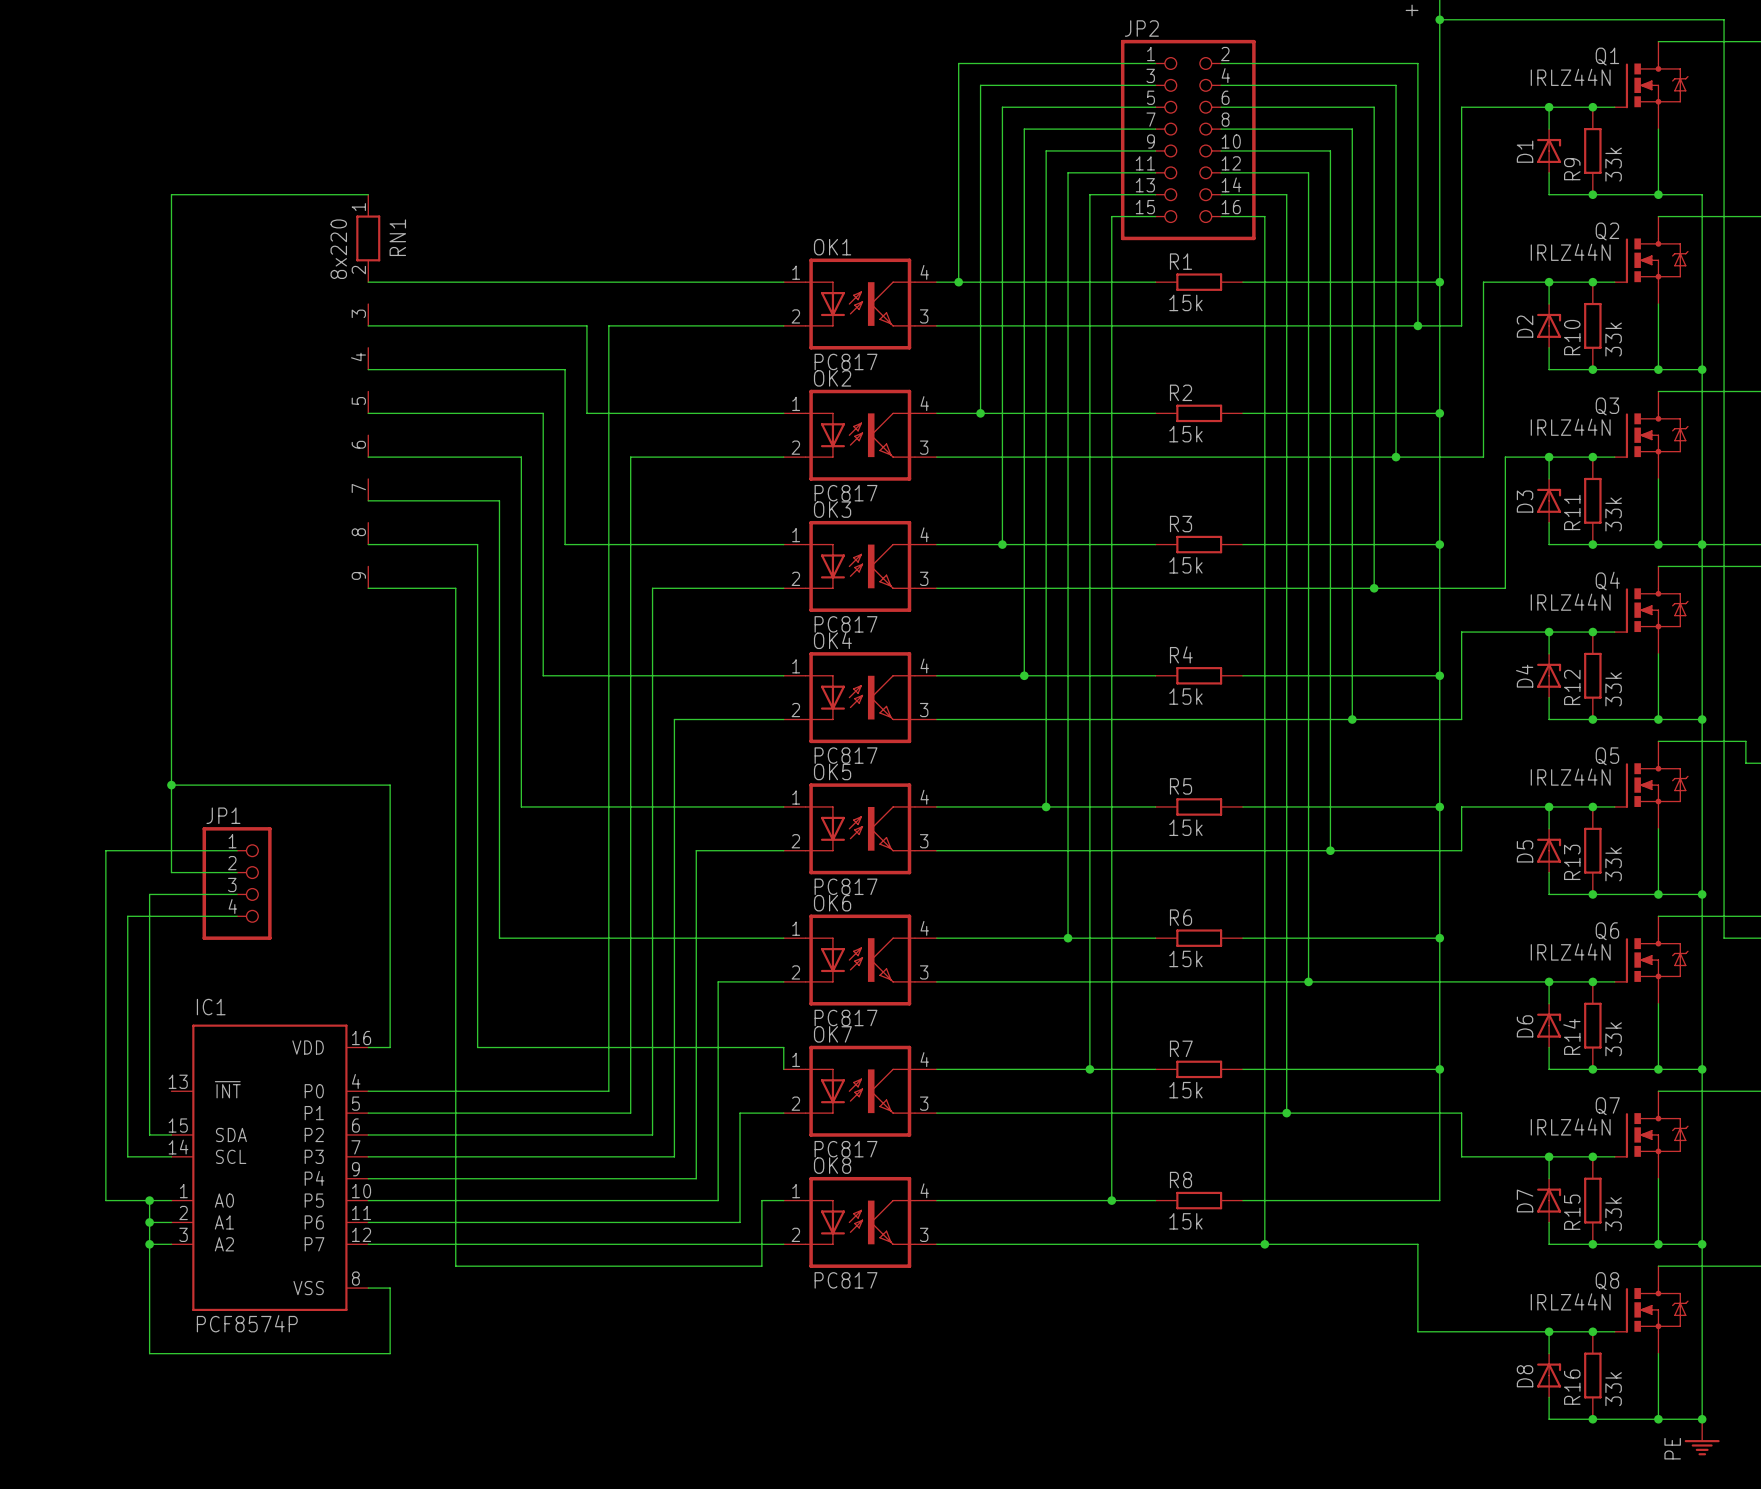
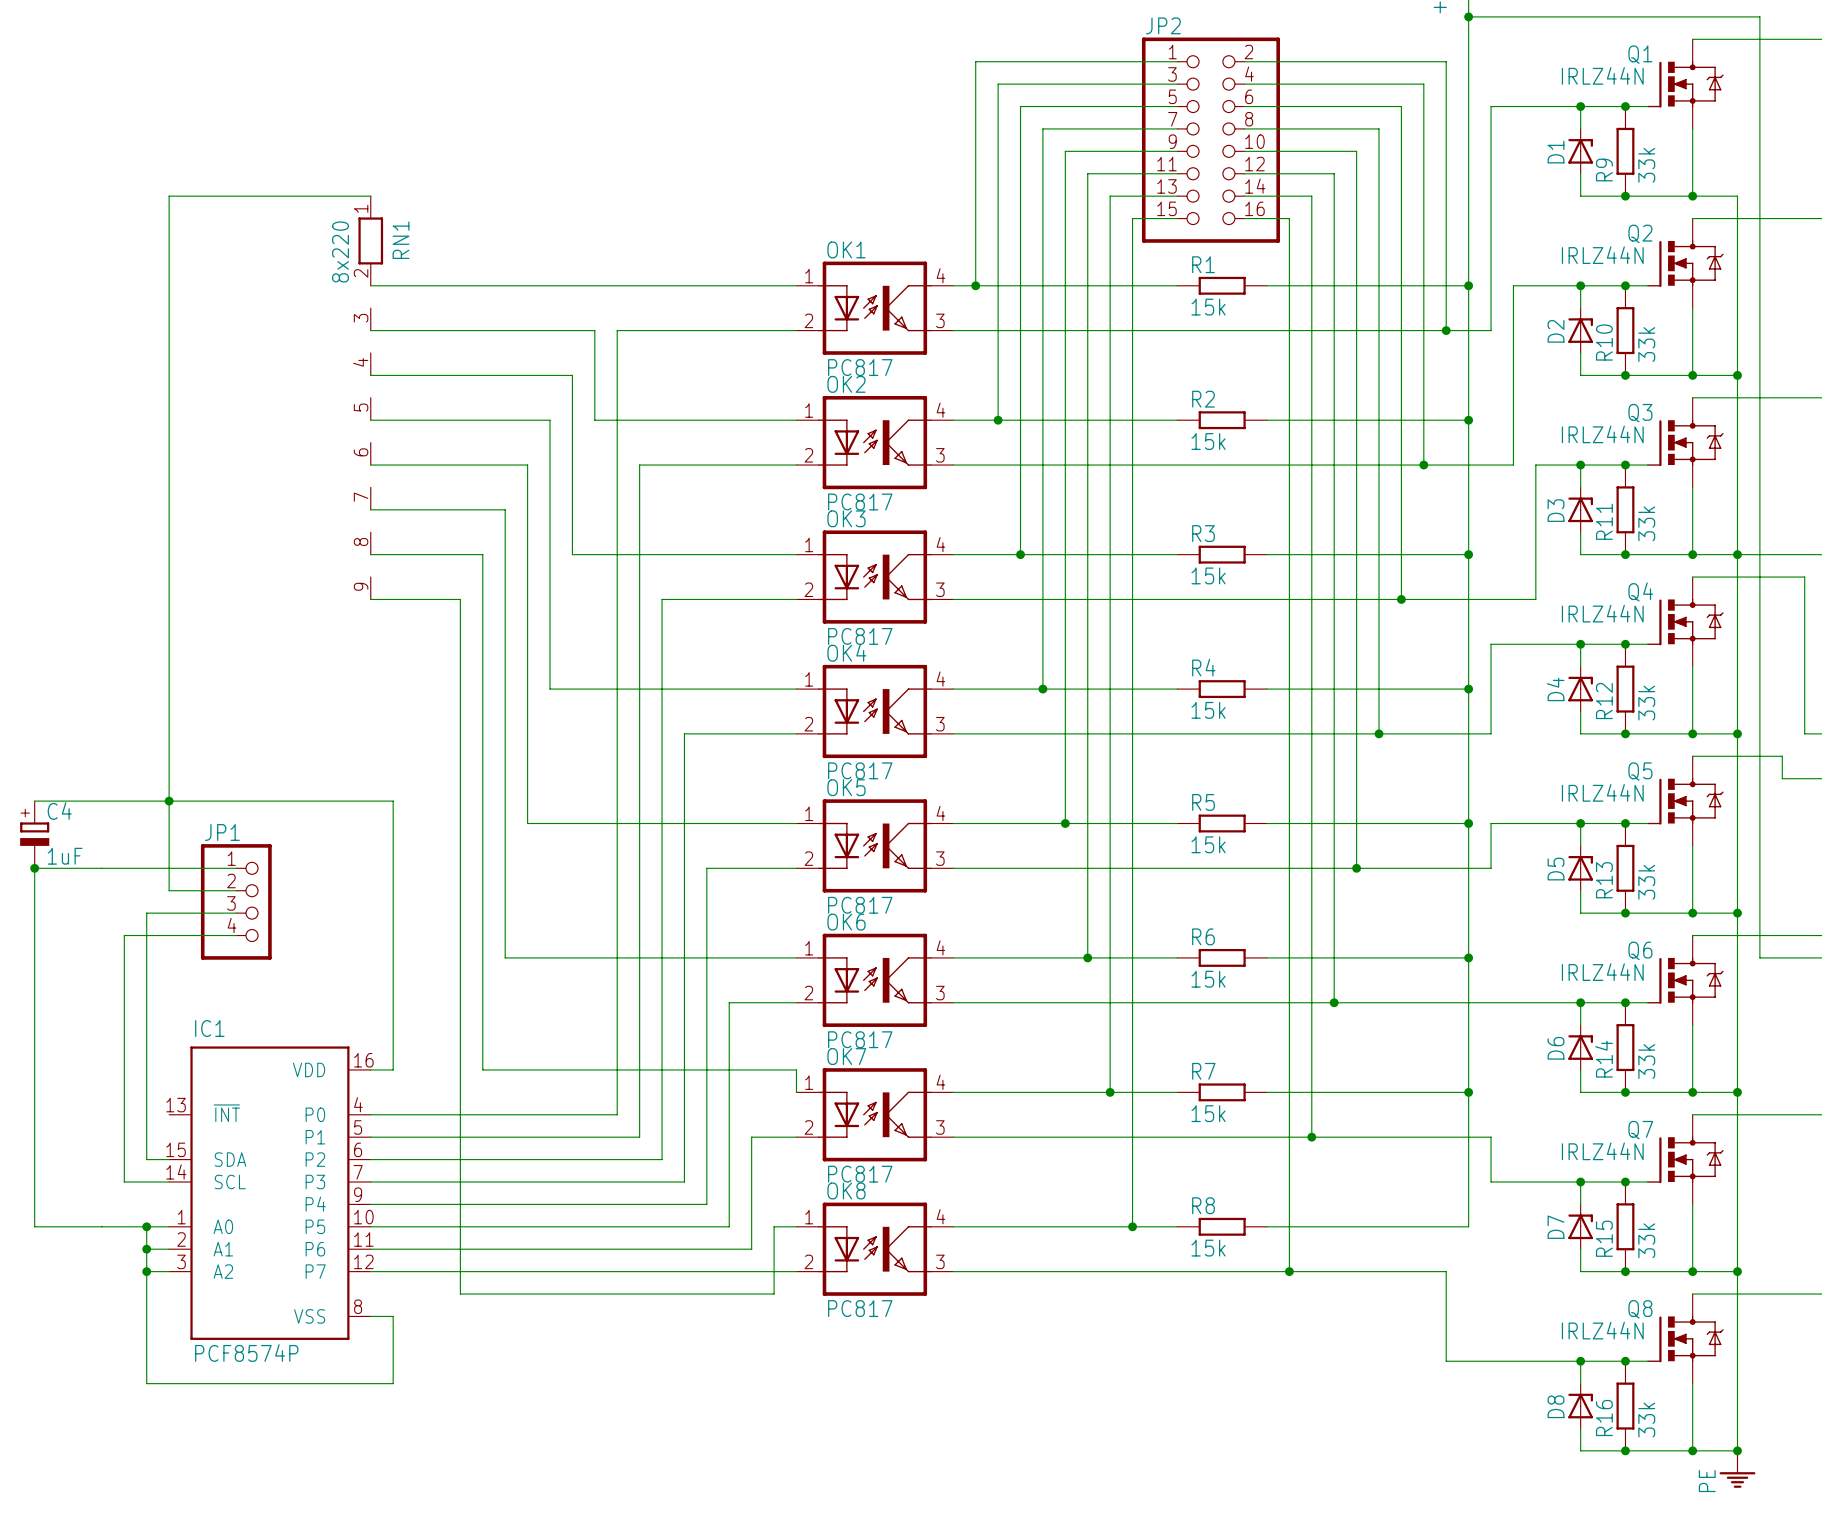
wire: none -> (34, 801) (169, 801)
C4: none -> 1uF (34, 834)
junction: none -> (34, 868)
wire: (105, 850) (105, 1200) -> (101, 868) (34, 868) (34, 1226) (101, 1226)

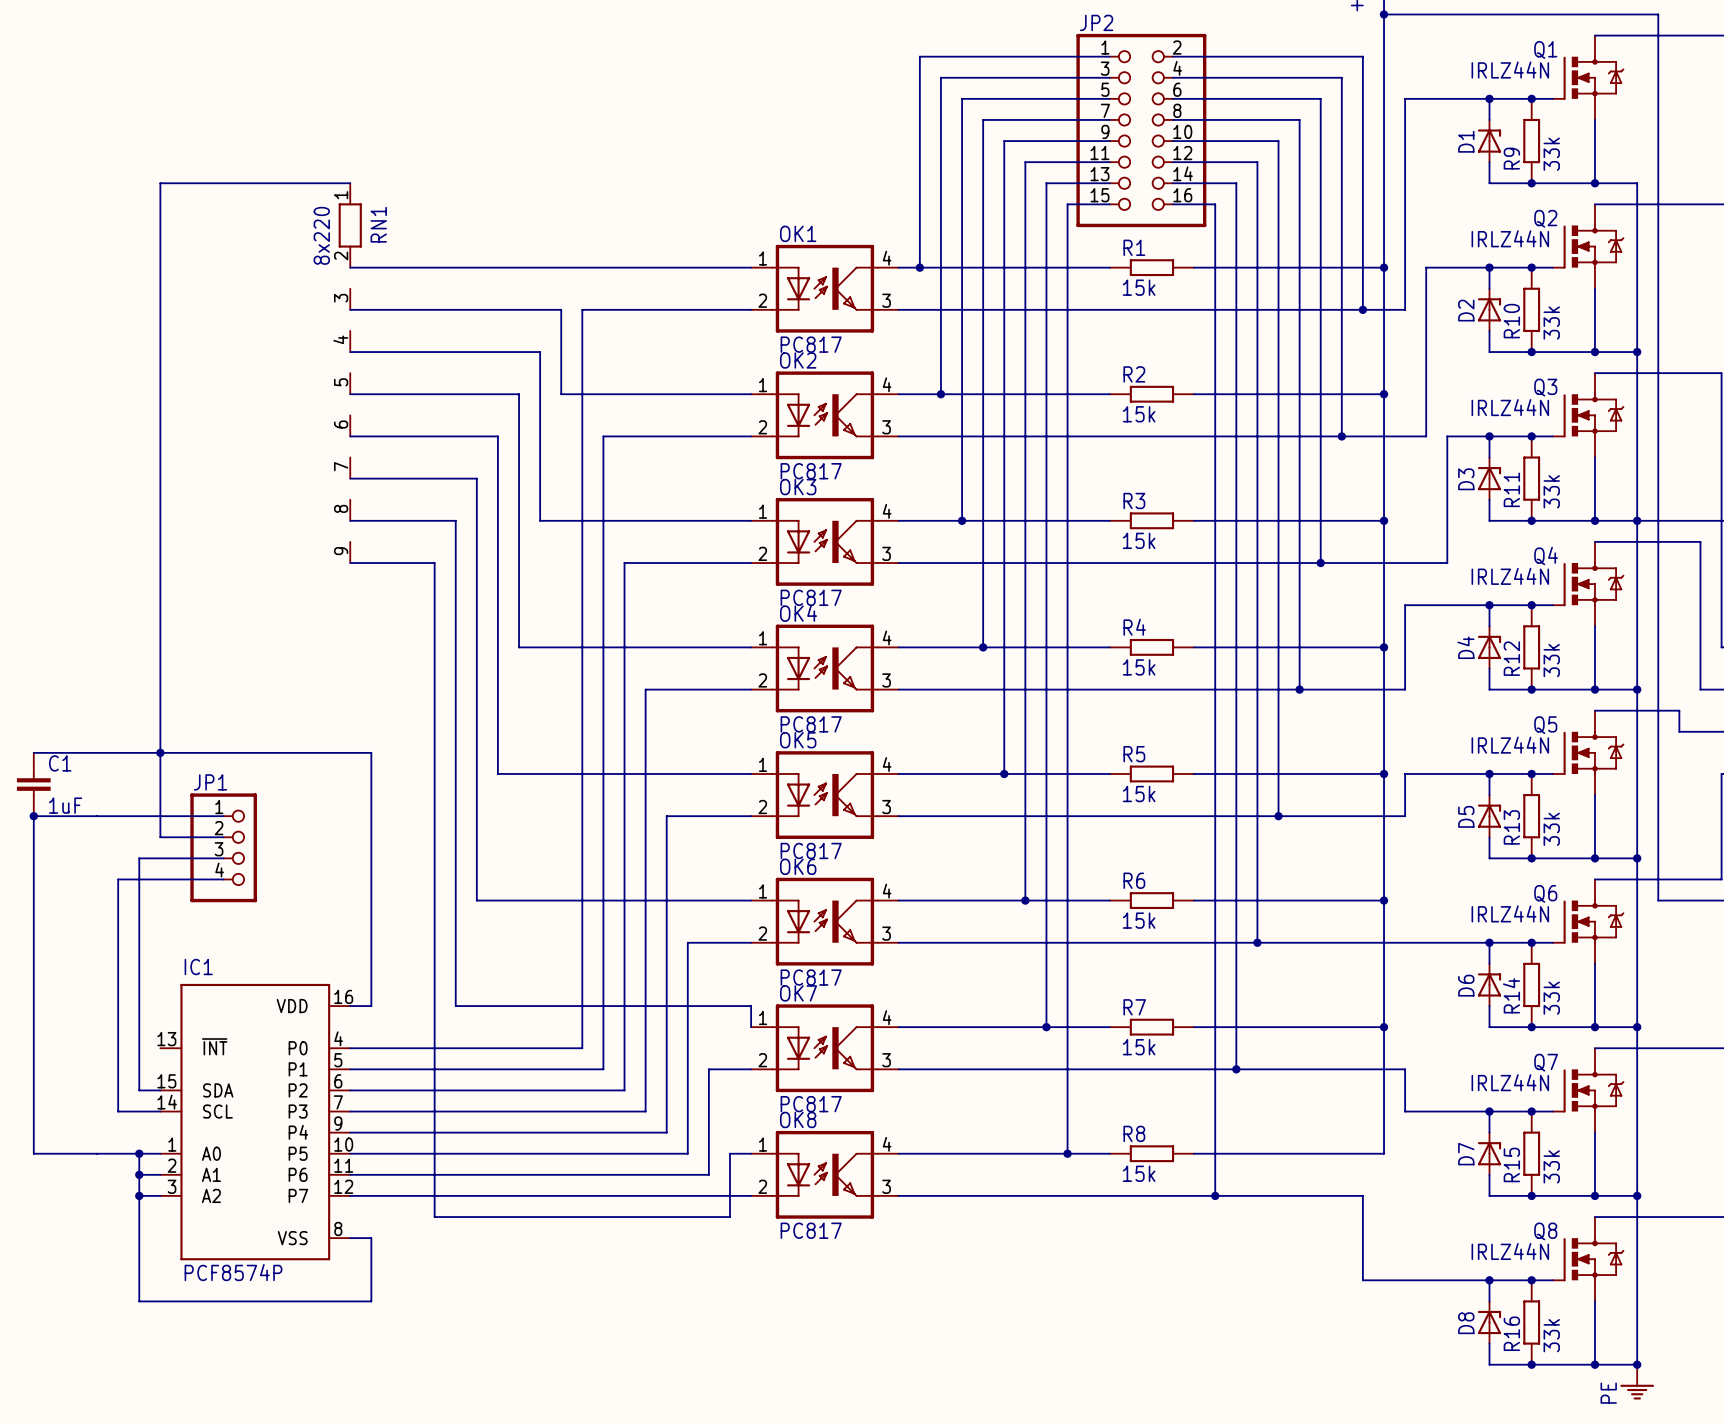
C4: 1uF (34, 834) -> none
C1: none -> 1uF (33, 784)

